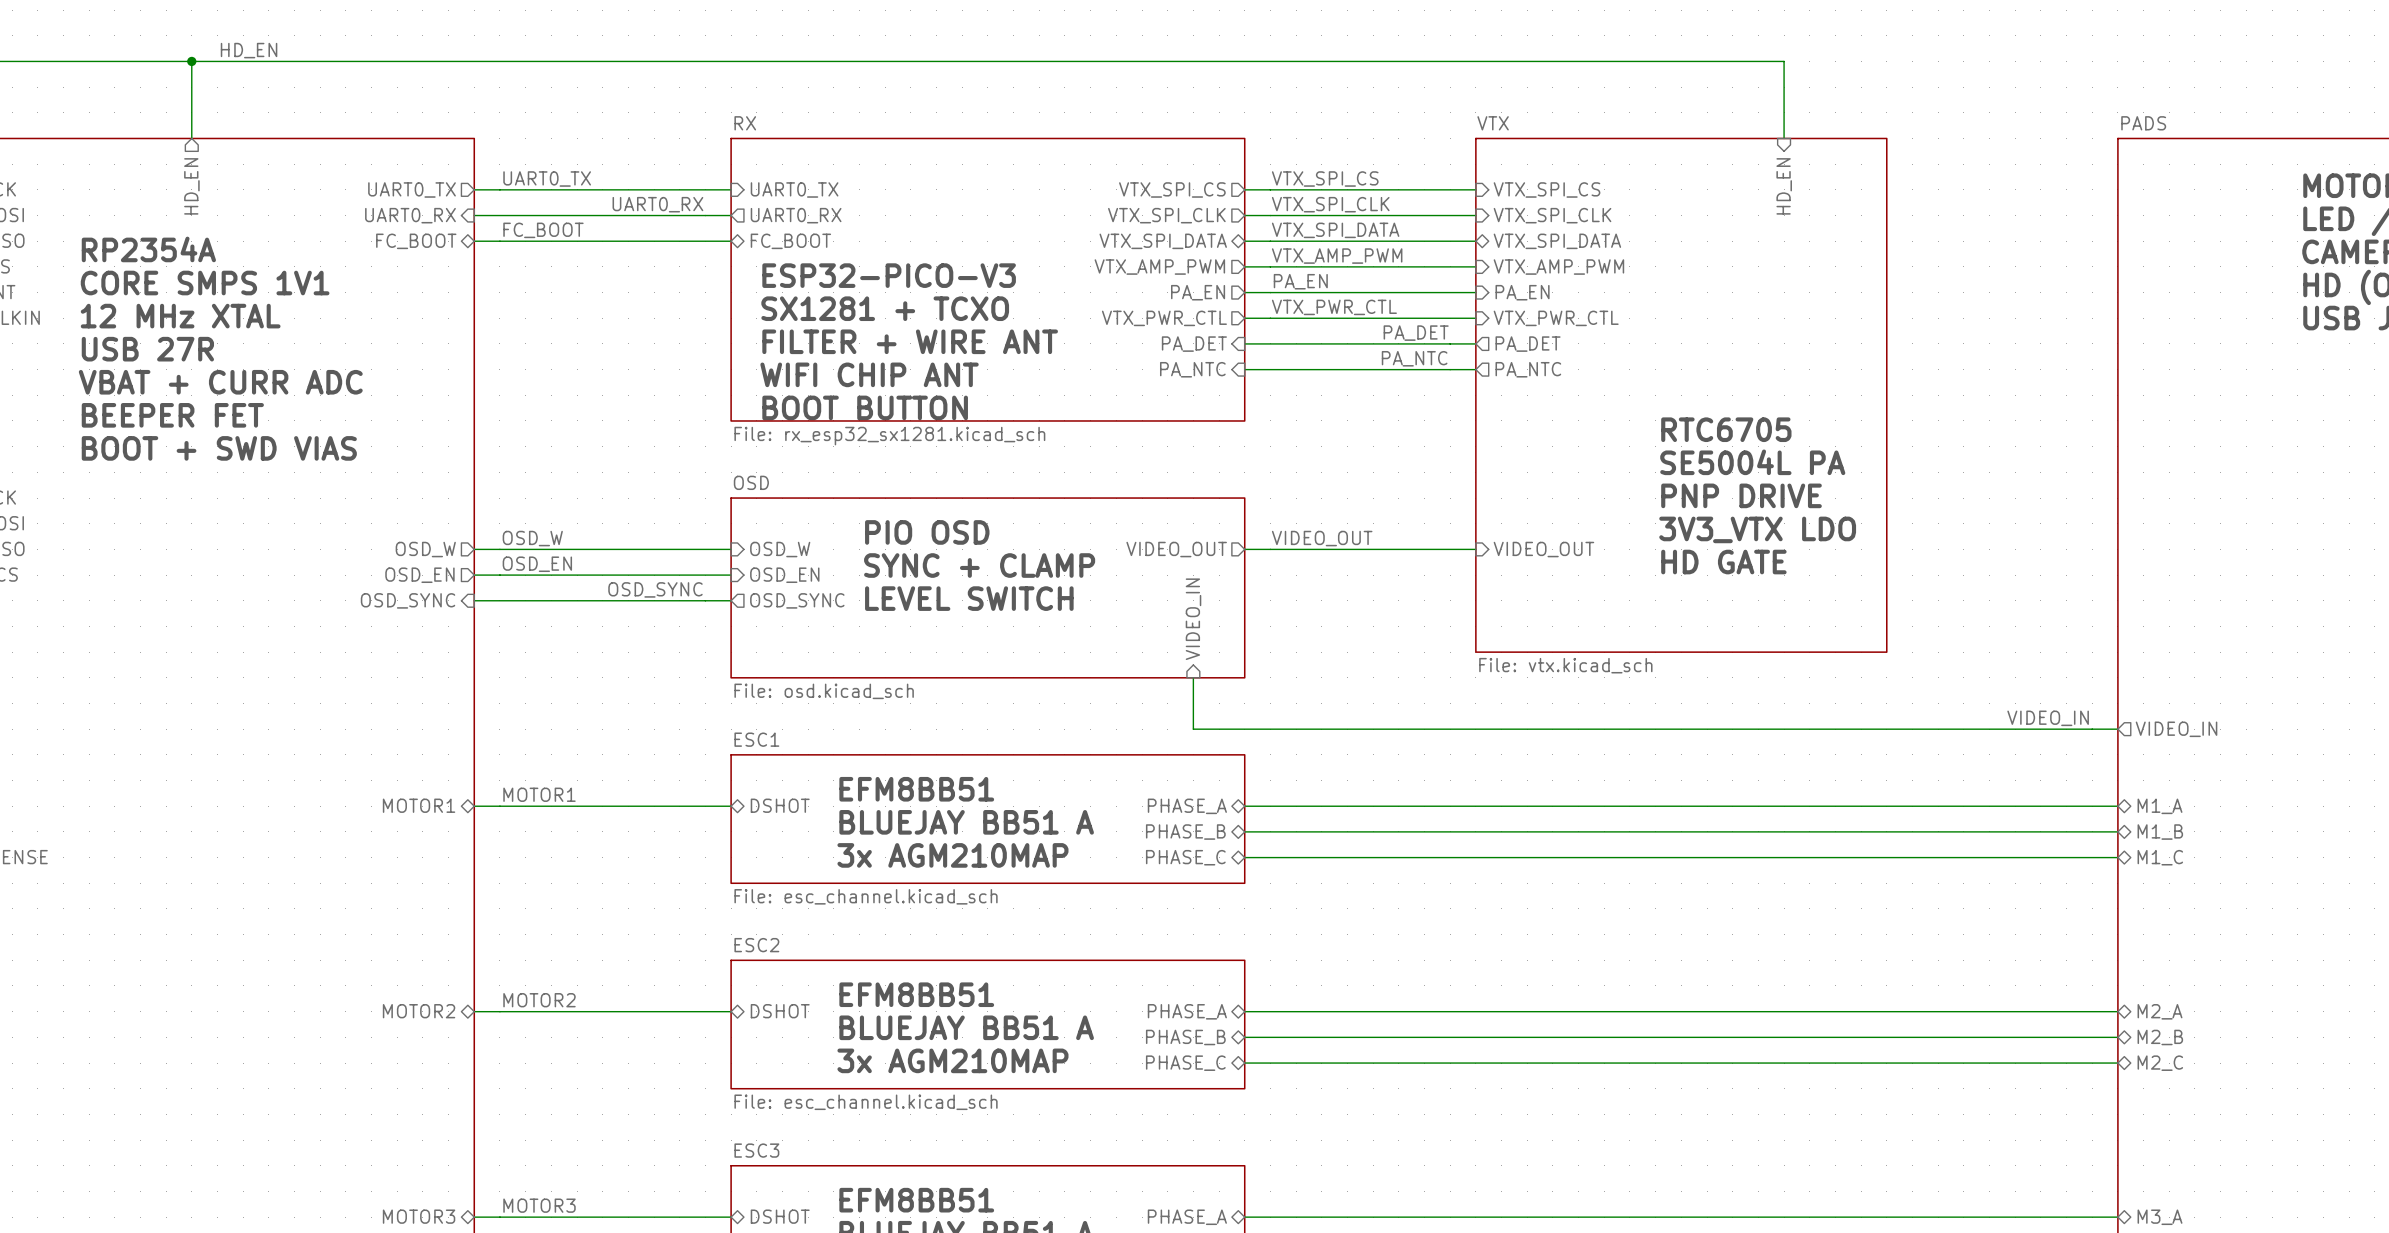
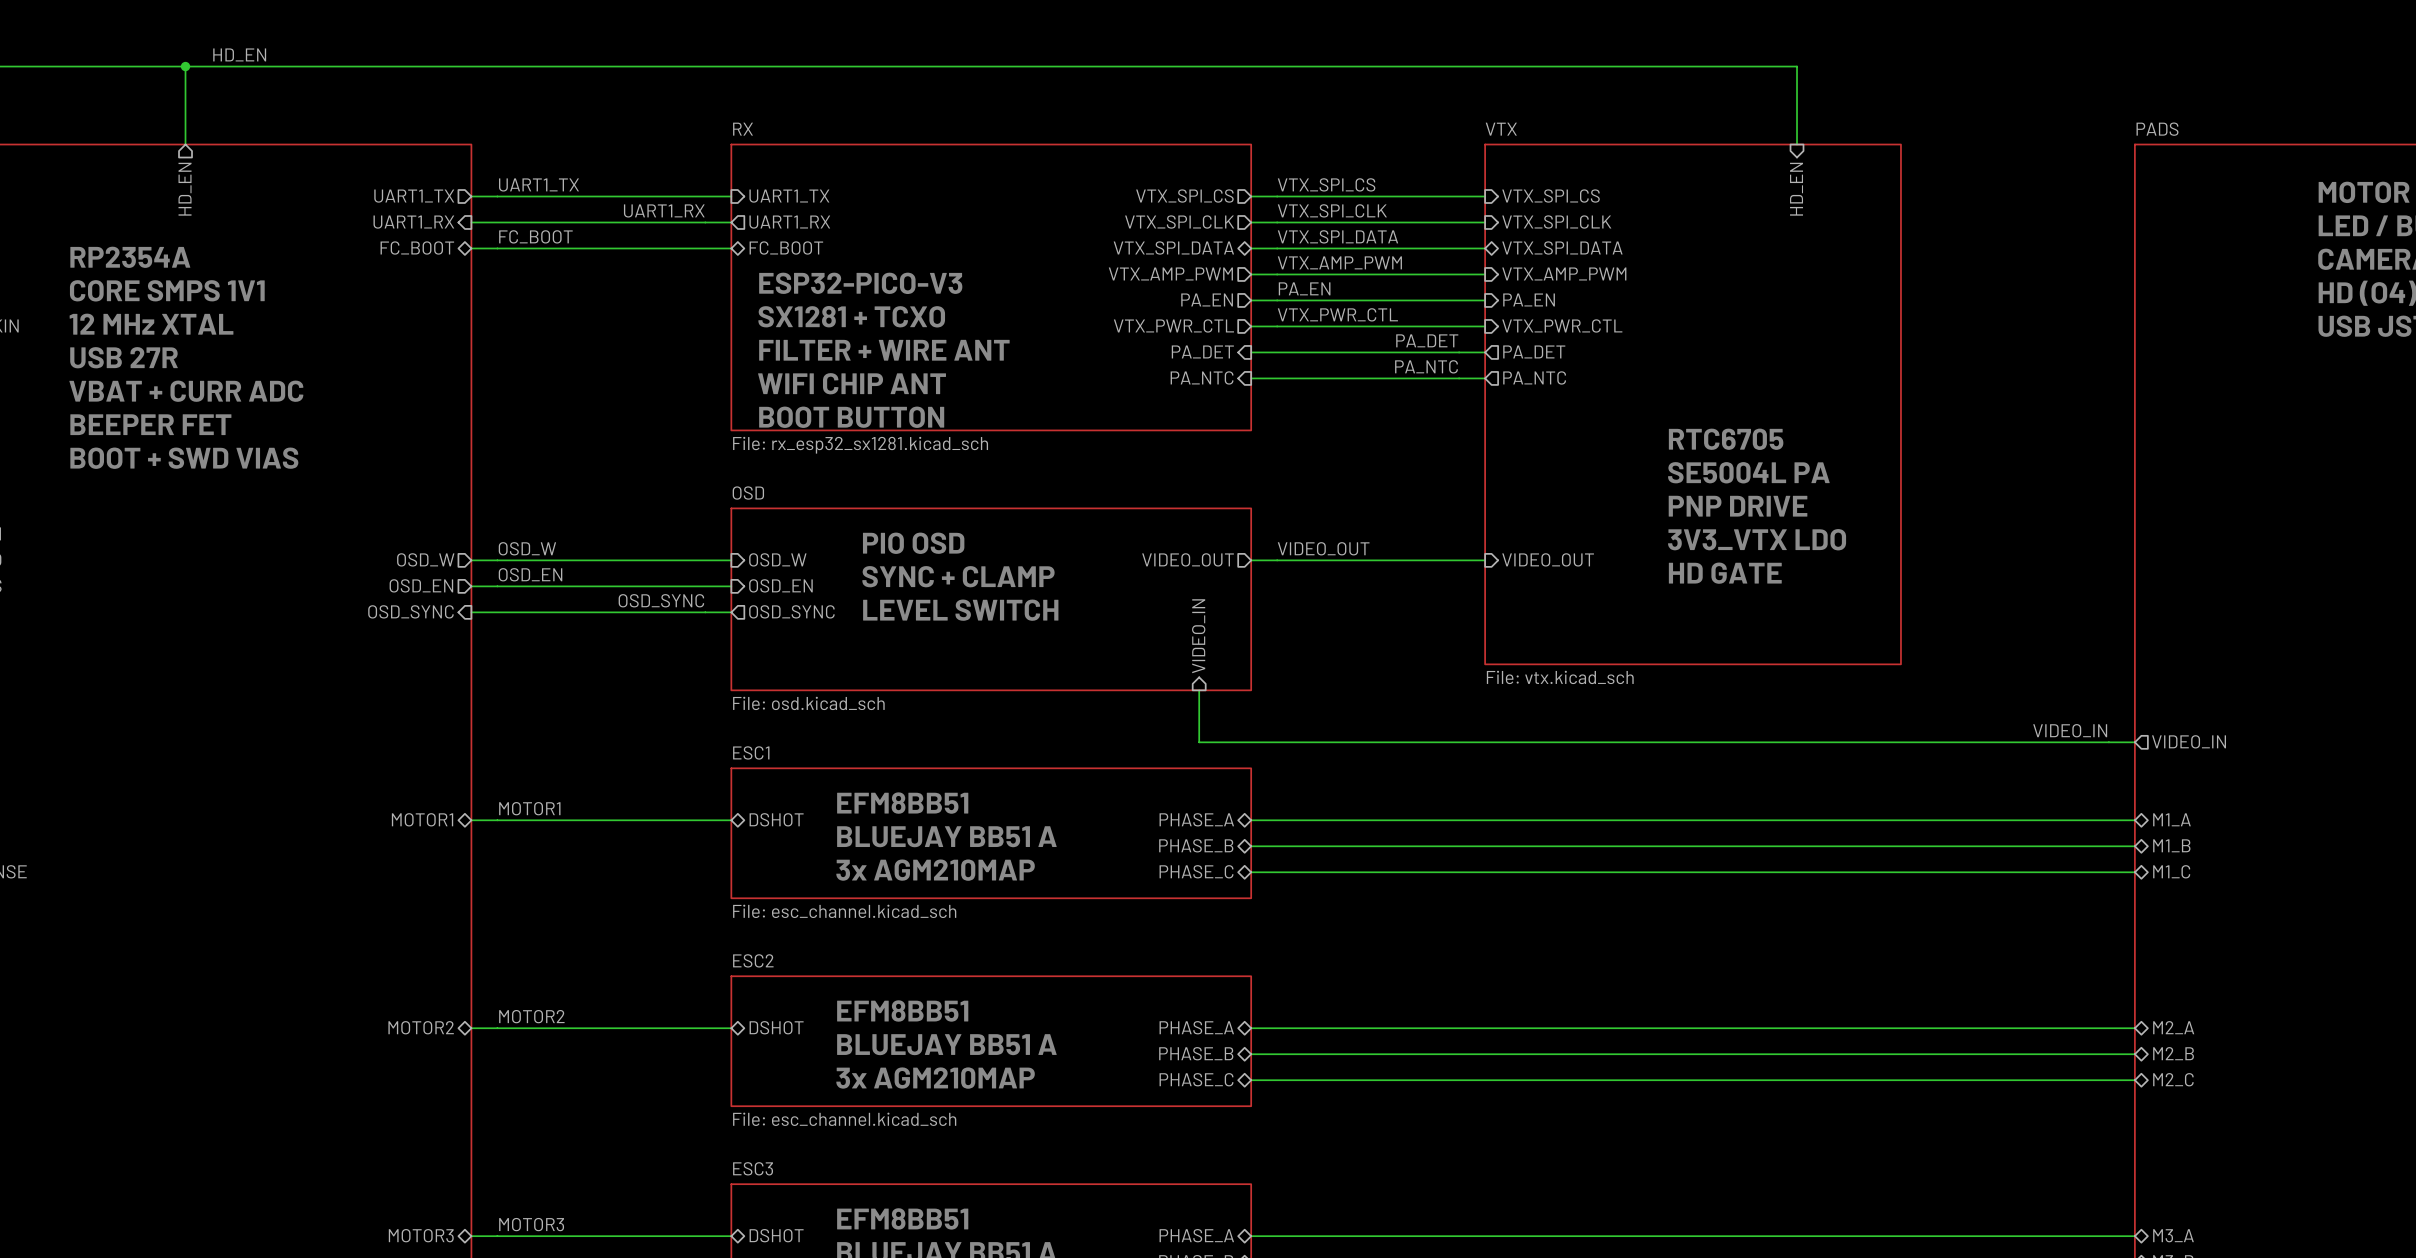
label: UART0_TX (547, 179) -> UART1_TX (538, 184)
sheet pin: UART0_TX (412, 189) -> UART1_TX (414, 196)
sheet pin: UART0_TX (794, 189) -> UART1_TX (789, 196)
label: UART0_RX (657, 204) -> UART1_RX (664, 210)
sheet pin: UART0_RX (410, 215) -> UART1_RX (413, 222)
sheet pin: UART0_RX (796, 215) -> UART1_RX (789, 222)

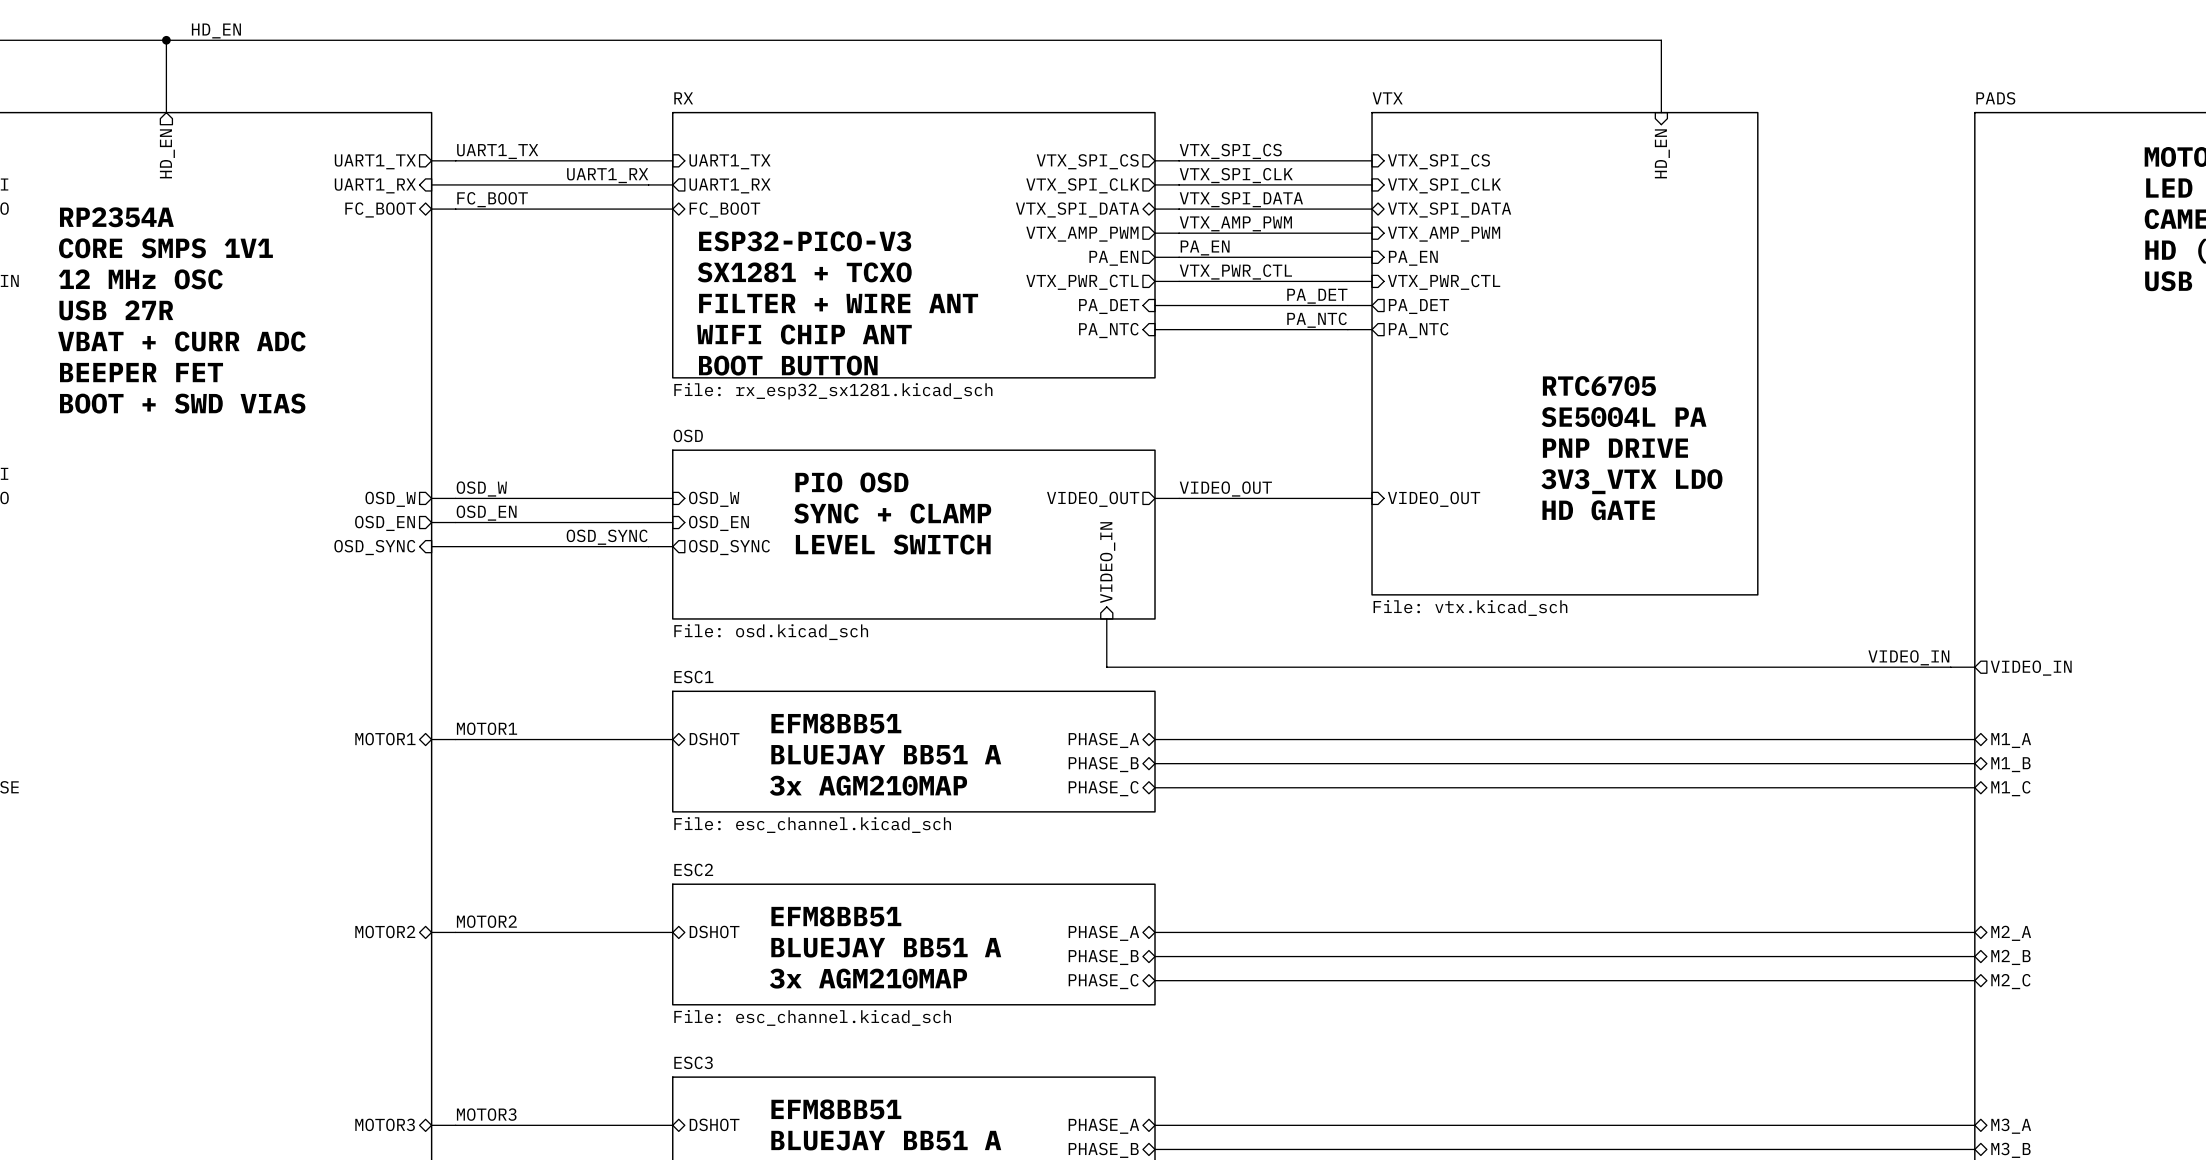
text: 12 MHz XTAL (151, 324) -> 12 MHz OSC (140, 279)

